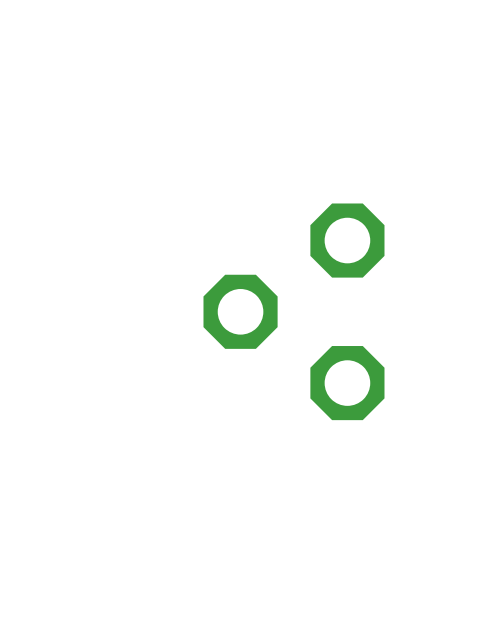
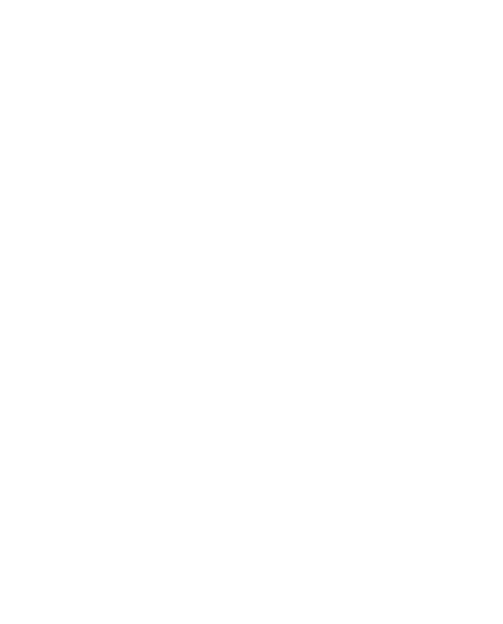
part: (293, 311) -> none

